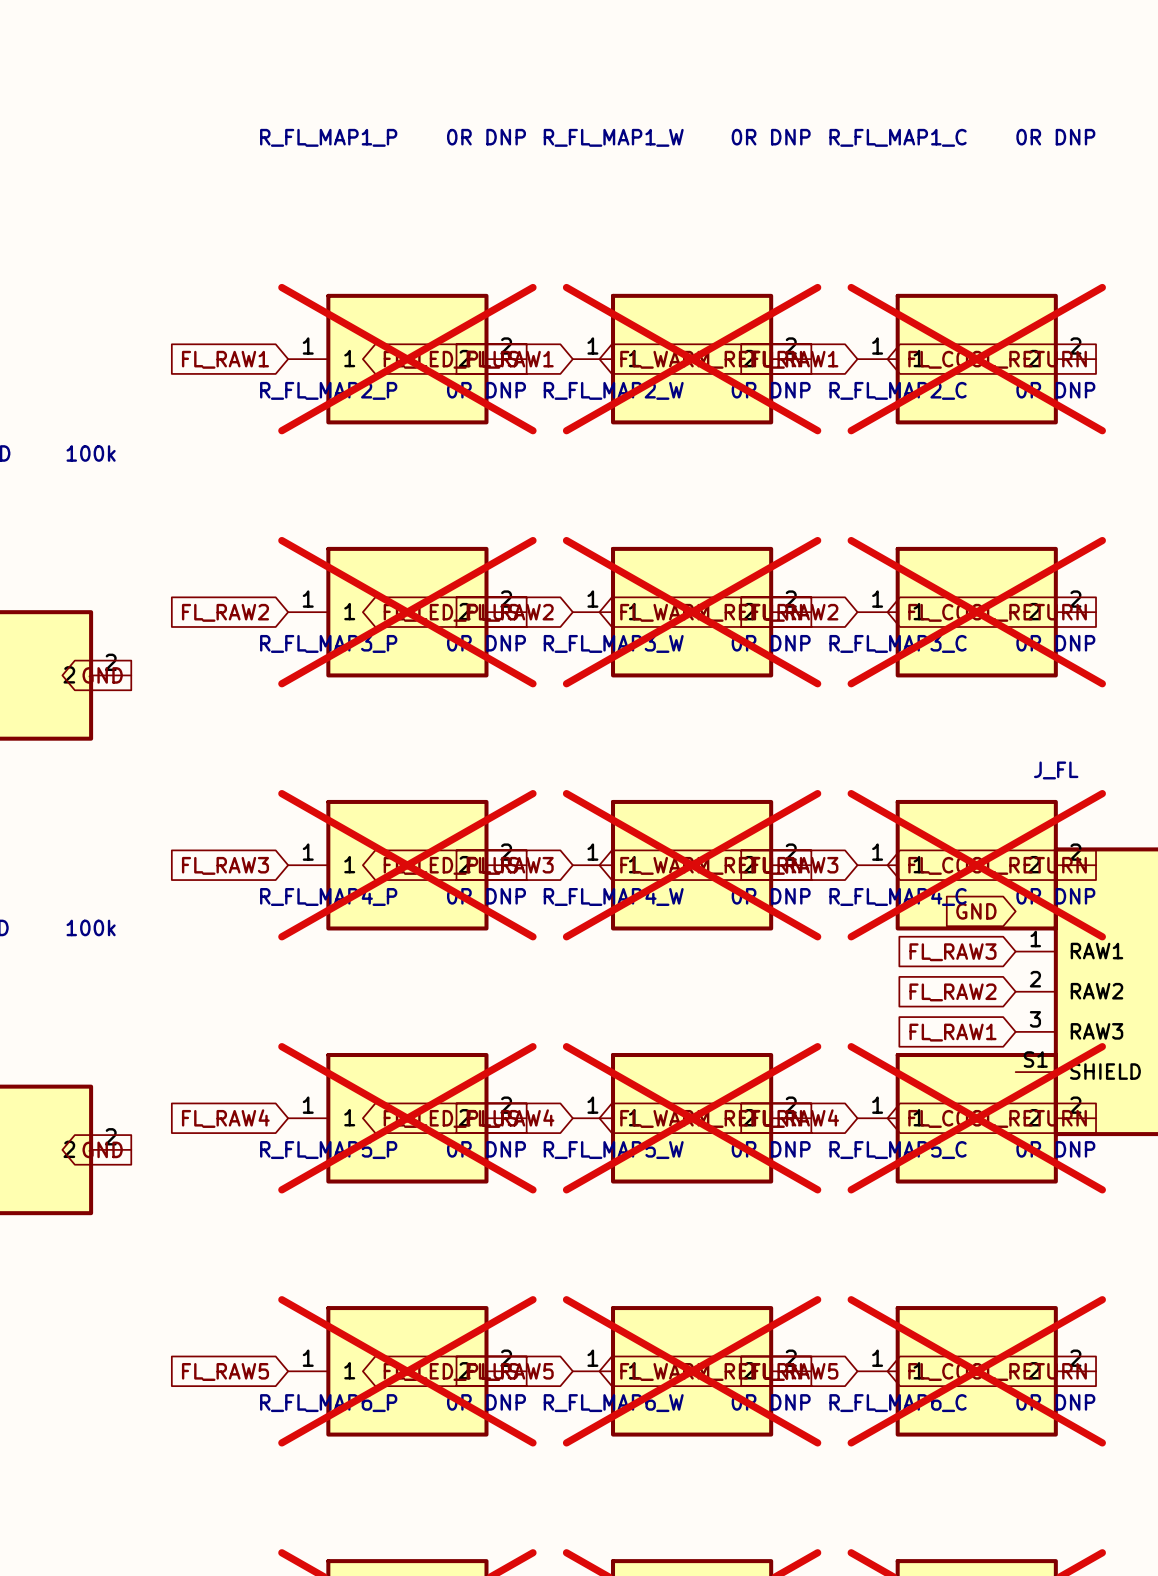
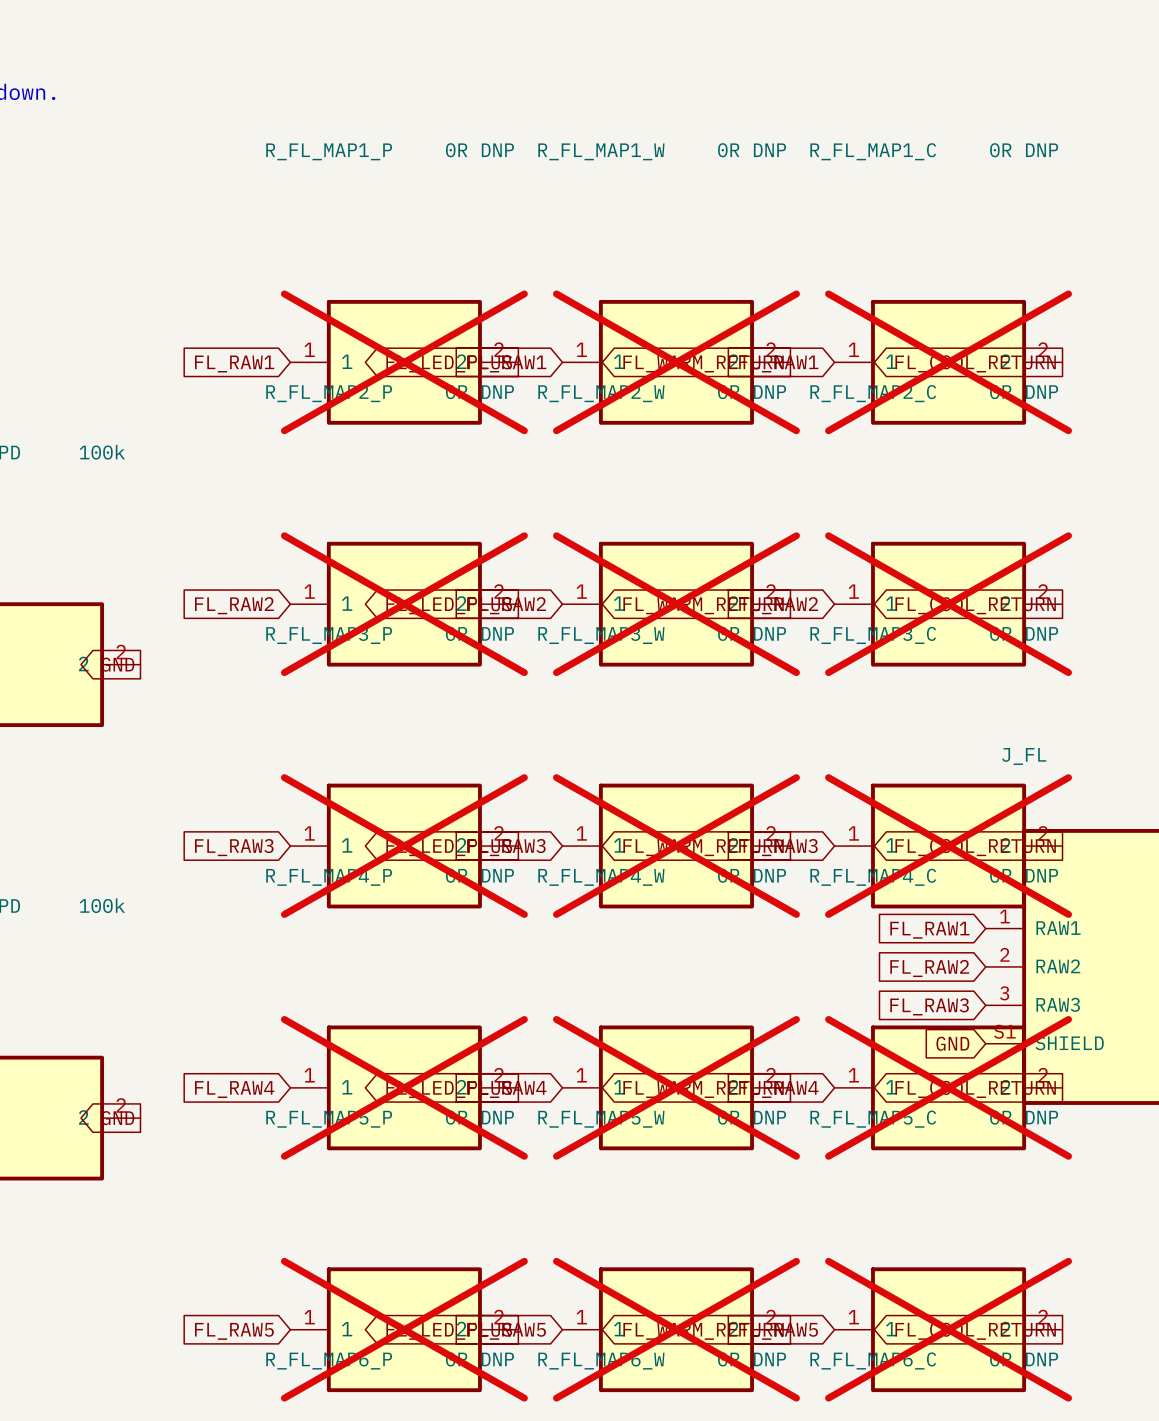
global label position: GND (976, 911) -> GND (952, 1043)
global label: FL_RAW3 (953, 952) -> FL_RAW1 (929, 930)
global label: FL_RAW1 (953, 1032) -> FL_RAW3 (929, 1006)

